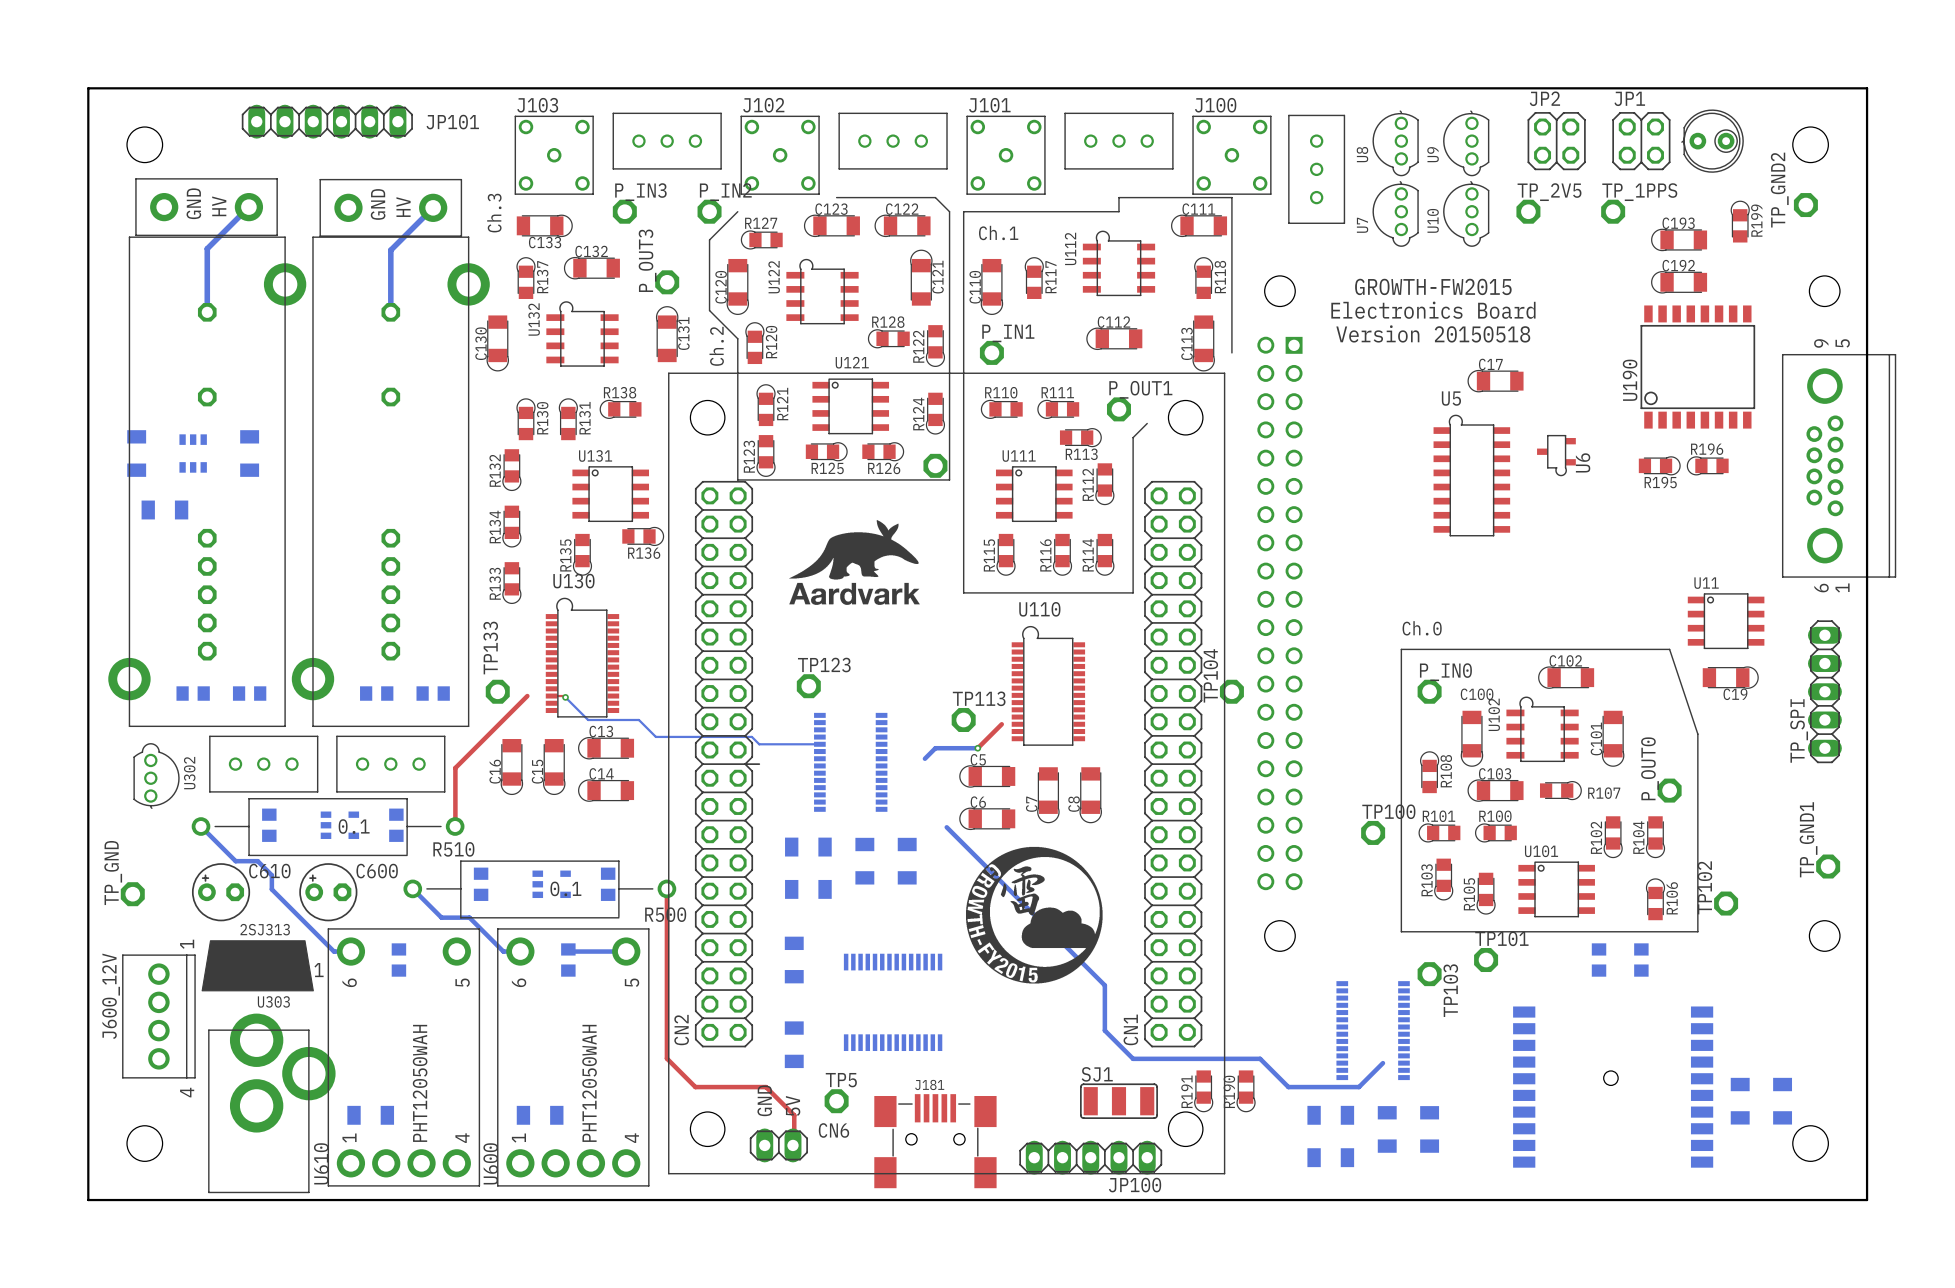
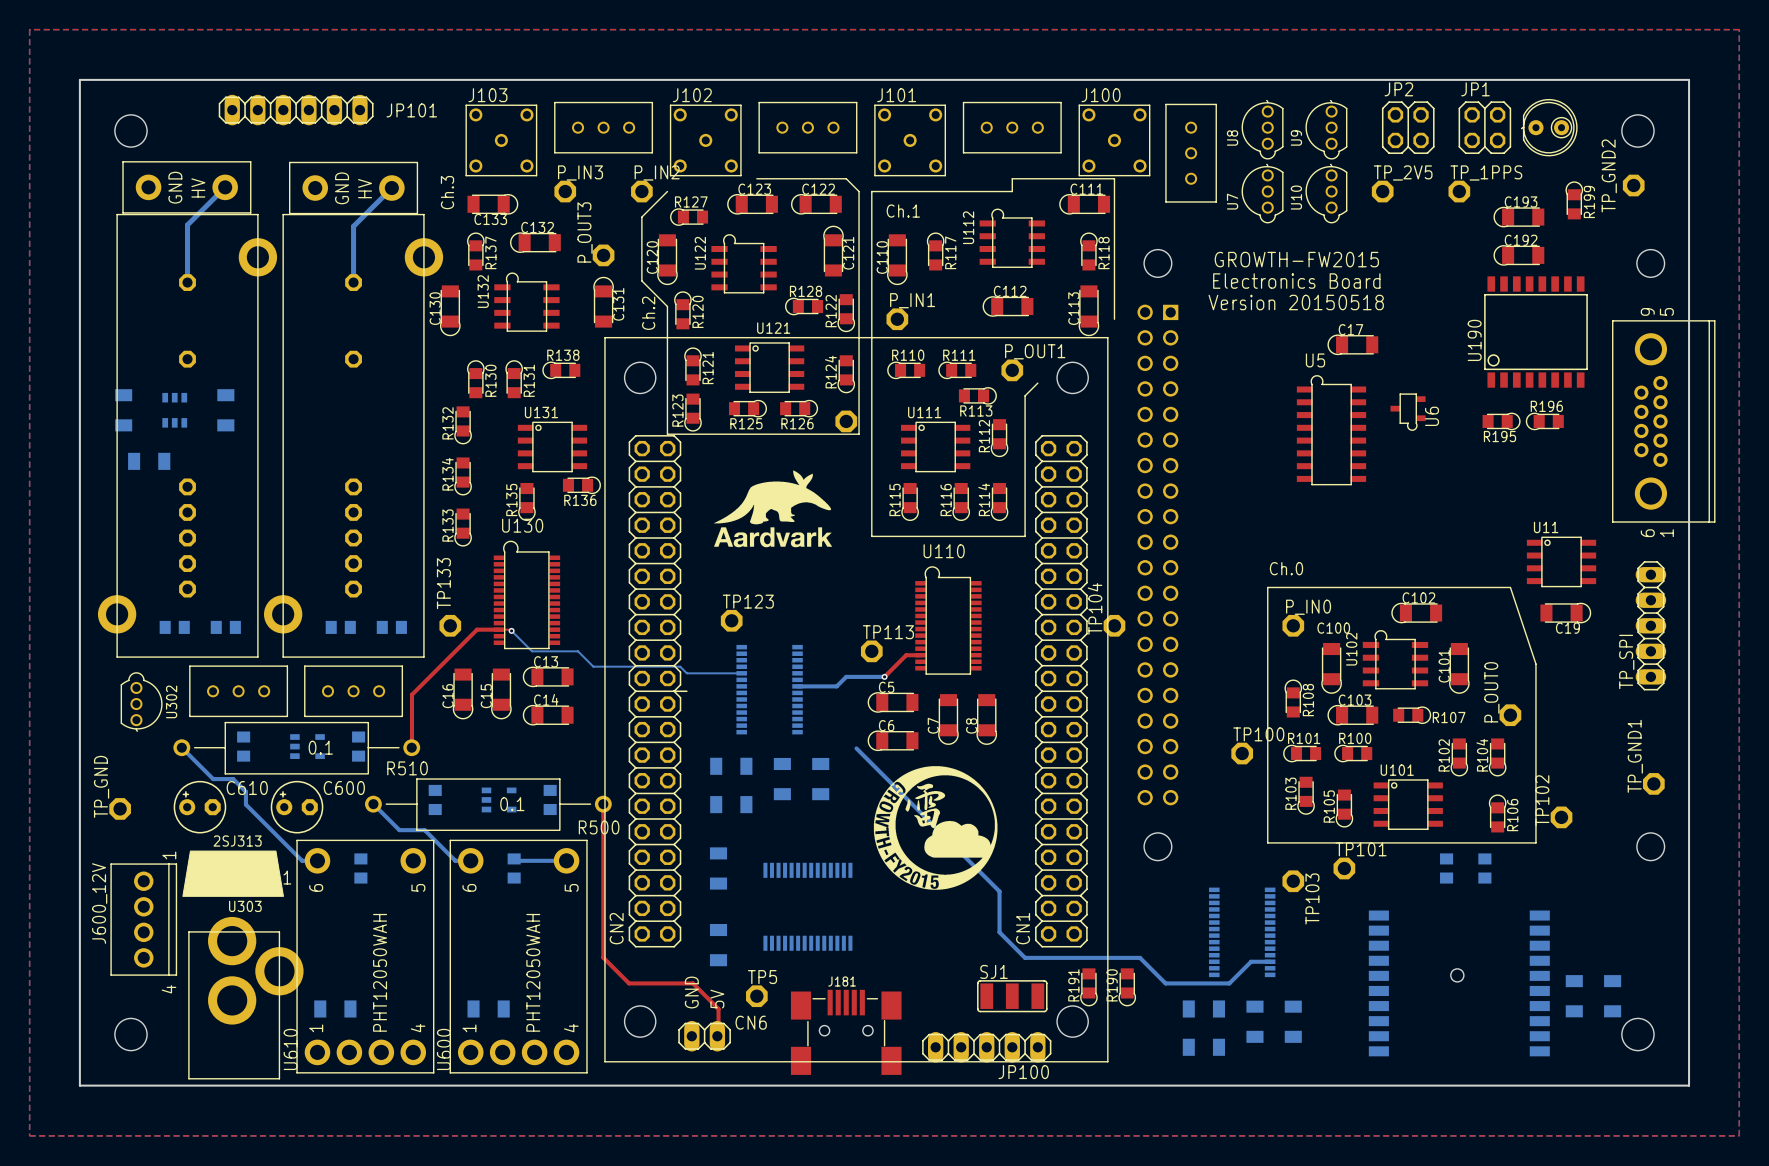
top zone outline: none -> (29, 29) (1739, 29) (1739, 1135) (29, 1135) (29, 29)
top track: none -> (477, 629) (499, 629)
top track: none -> (906, 655) (920, 655)
bottom track: none -> (797, 686) (836, 686)
bottom track: none -> (1251, 961) (1270, 961)

